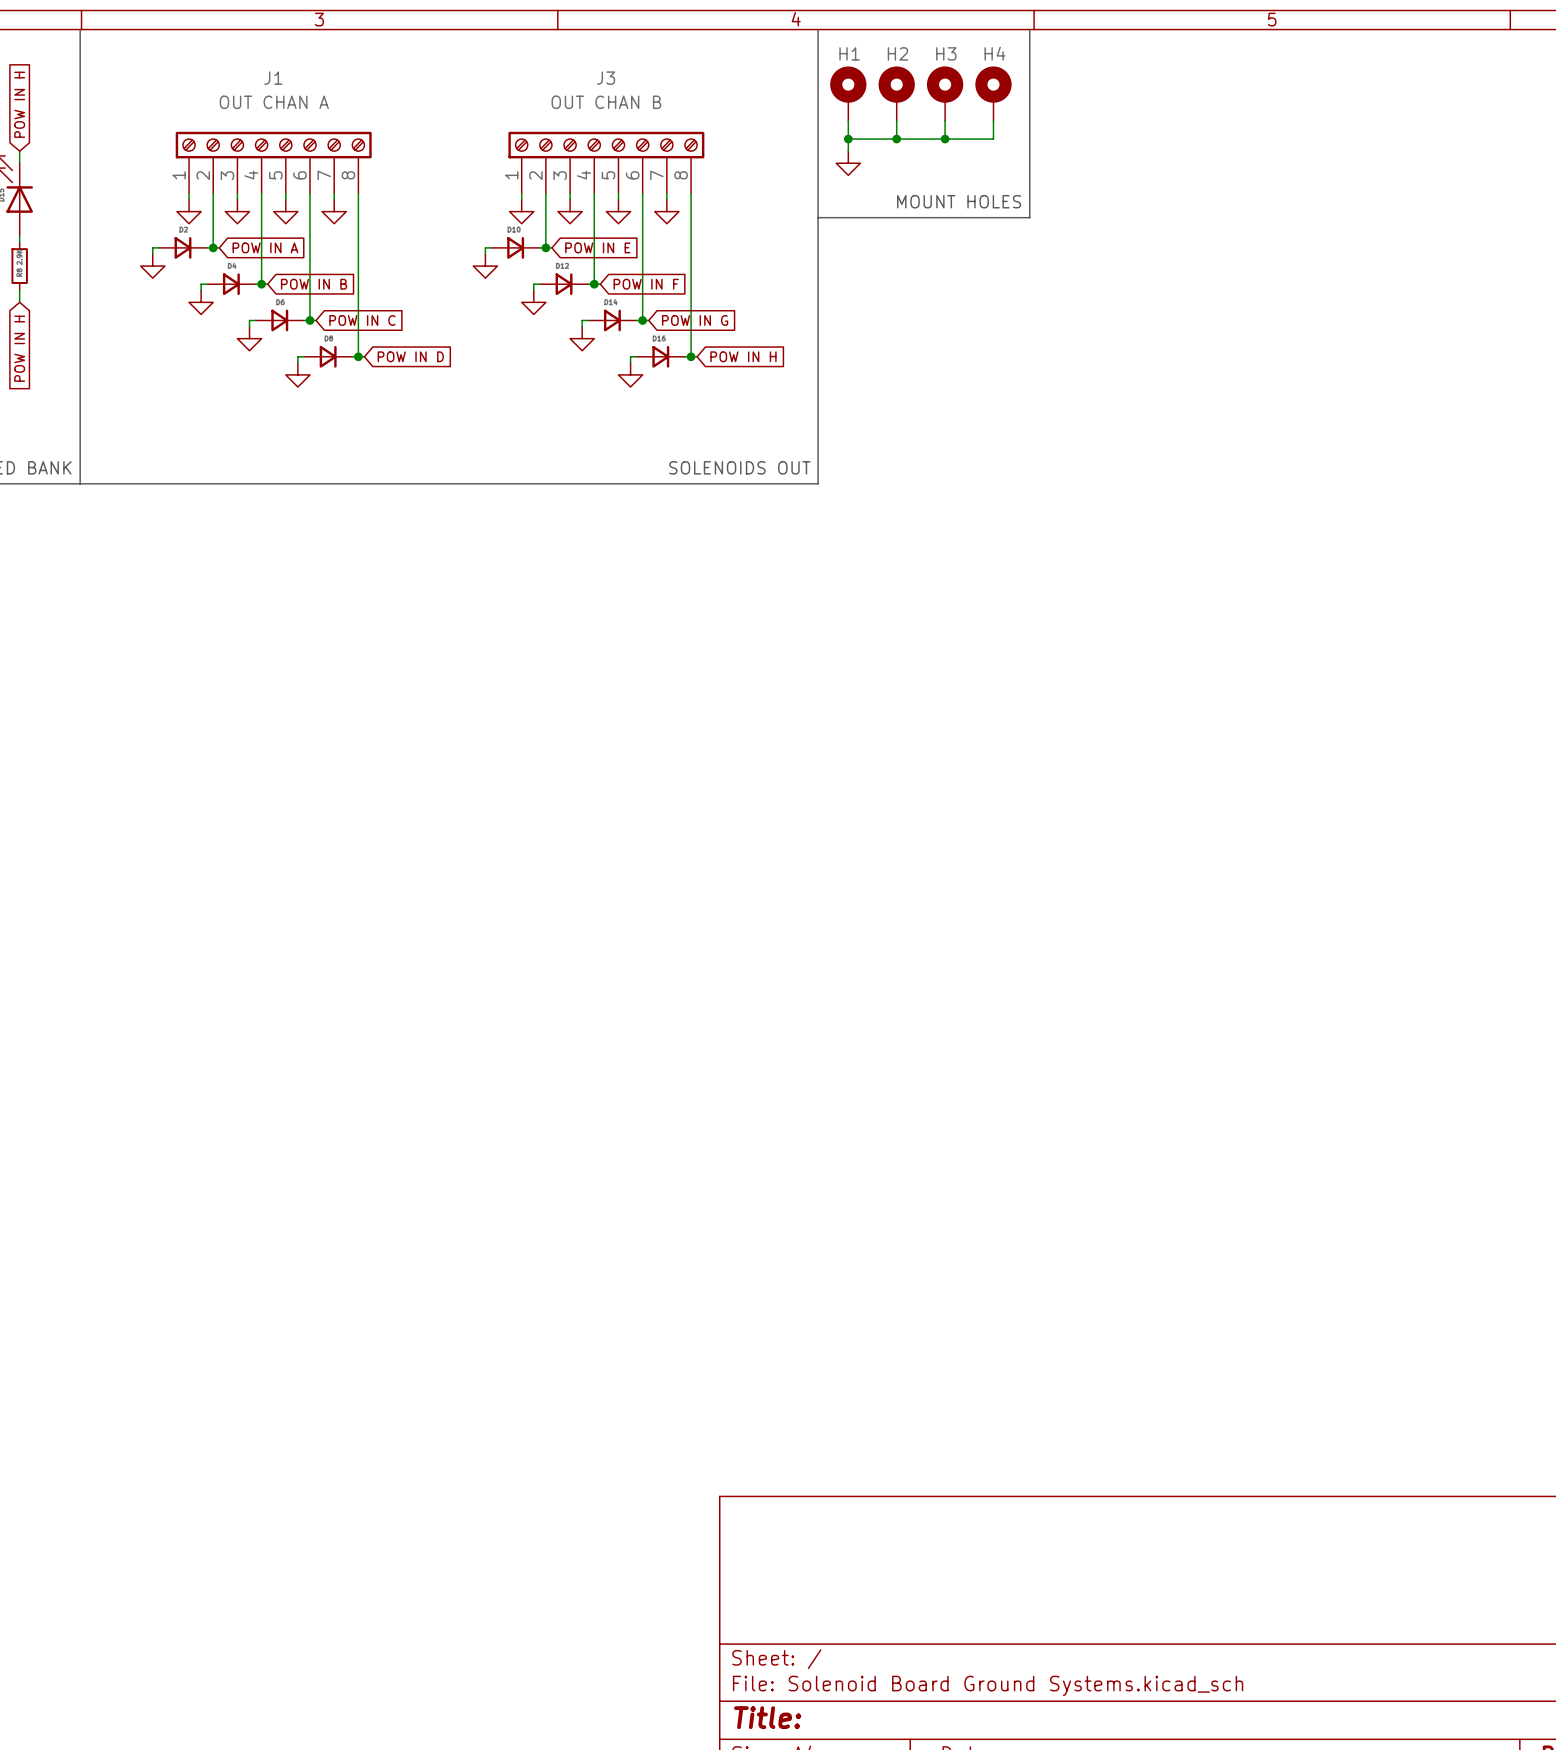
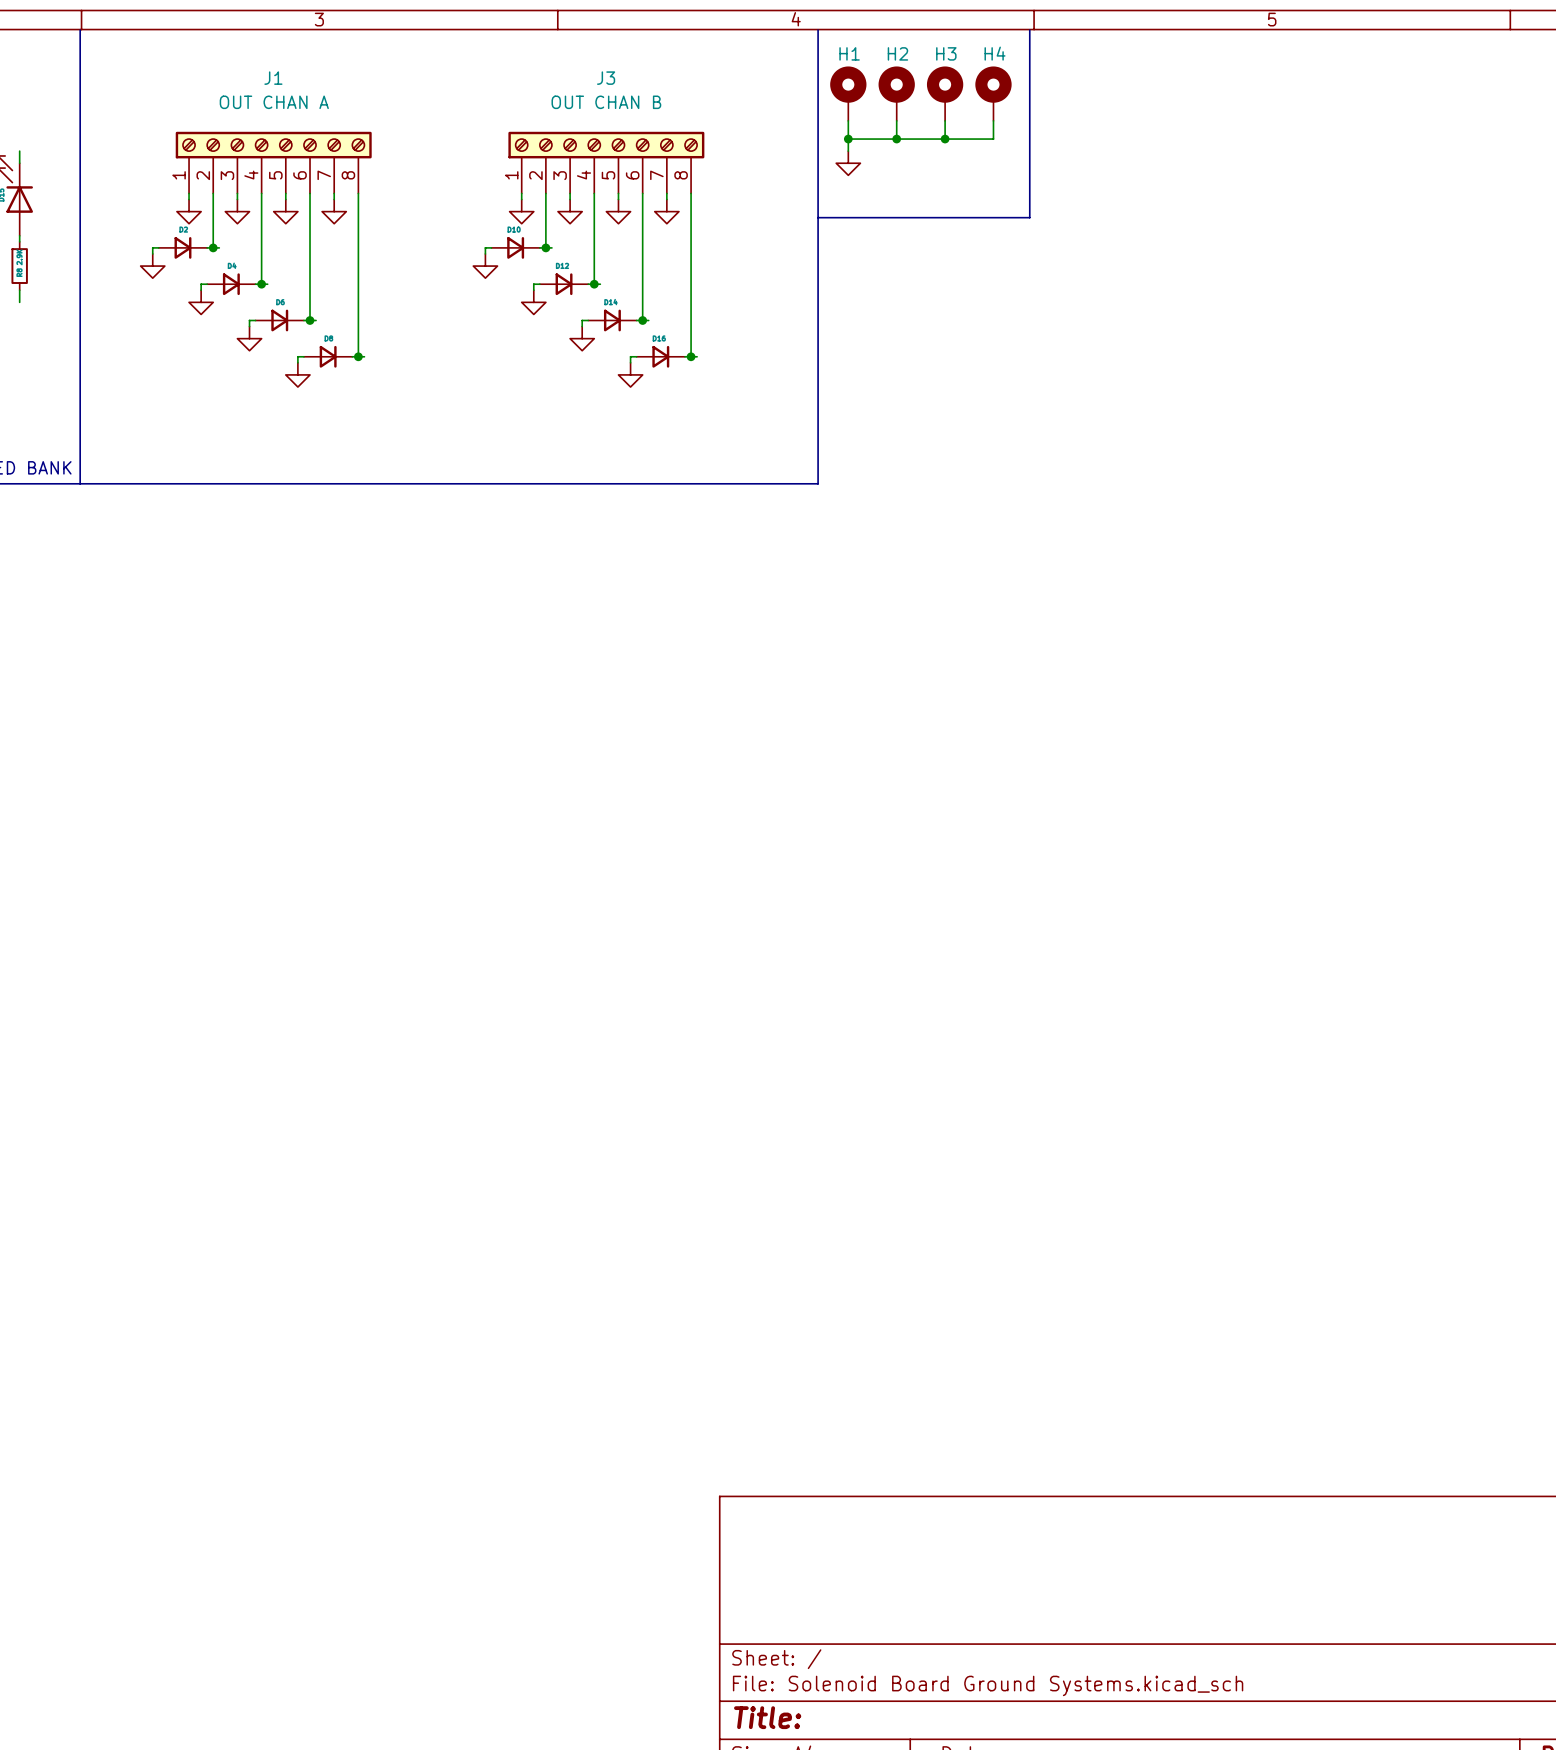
global label: POW IN H (19, 104) -> none
text: MOUNT HOLES (959, 201) -> none
global label: POW IN A (265, 247) -> none
global label: POW IN E (597, 247) -> none
global label: POW IN B (314, 284) -> none
global label: POW IN F (646, 284) -> none
global label: POW IN C (362, 320) -> none
global label: POW IN G (695, 320) -> none
global label: POW IN H (19, 348) -> none
global label: POW IN D (410, 356) -> none
global label: POW IN H (743, 356) -> none
text: SOLENOIDS OUT (739, 467) -> none

